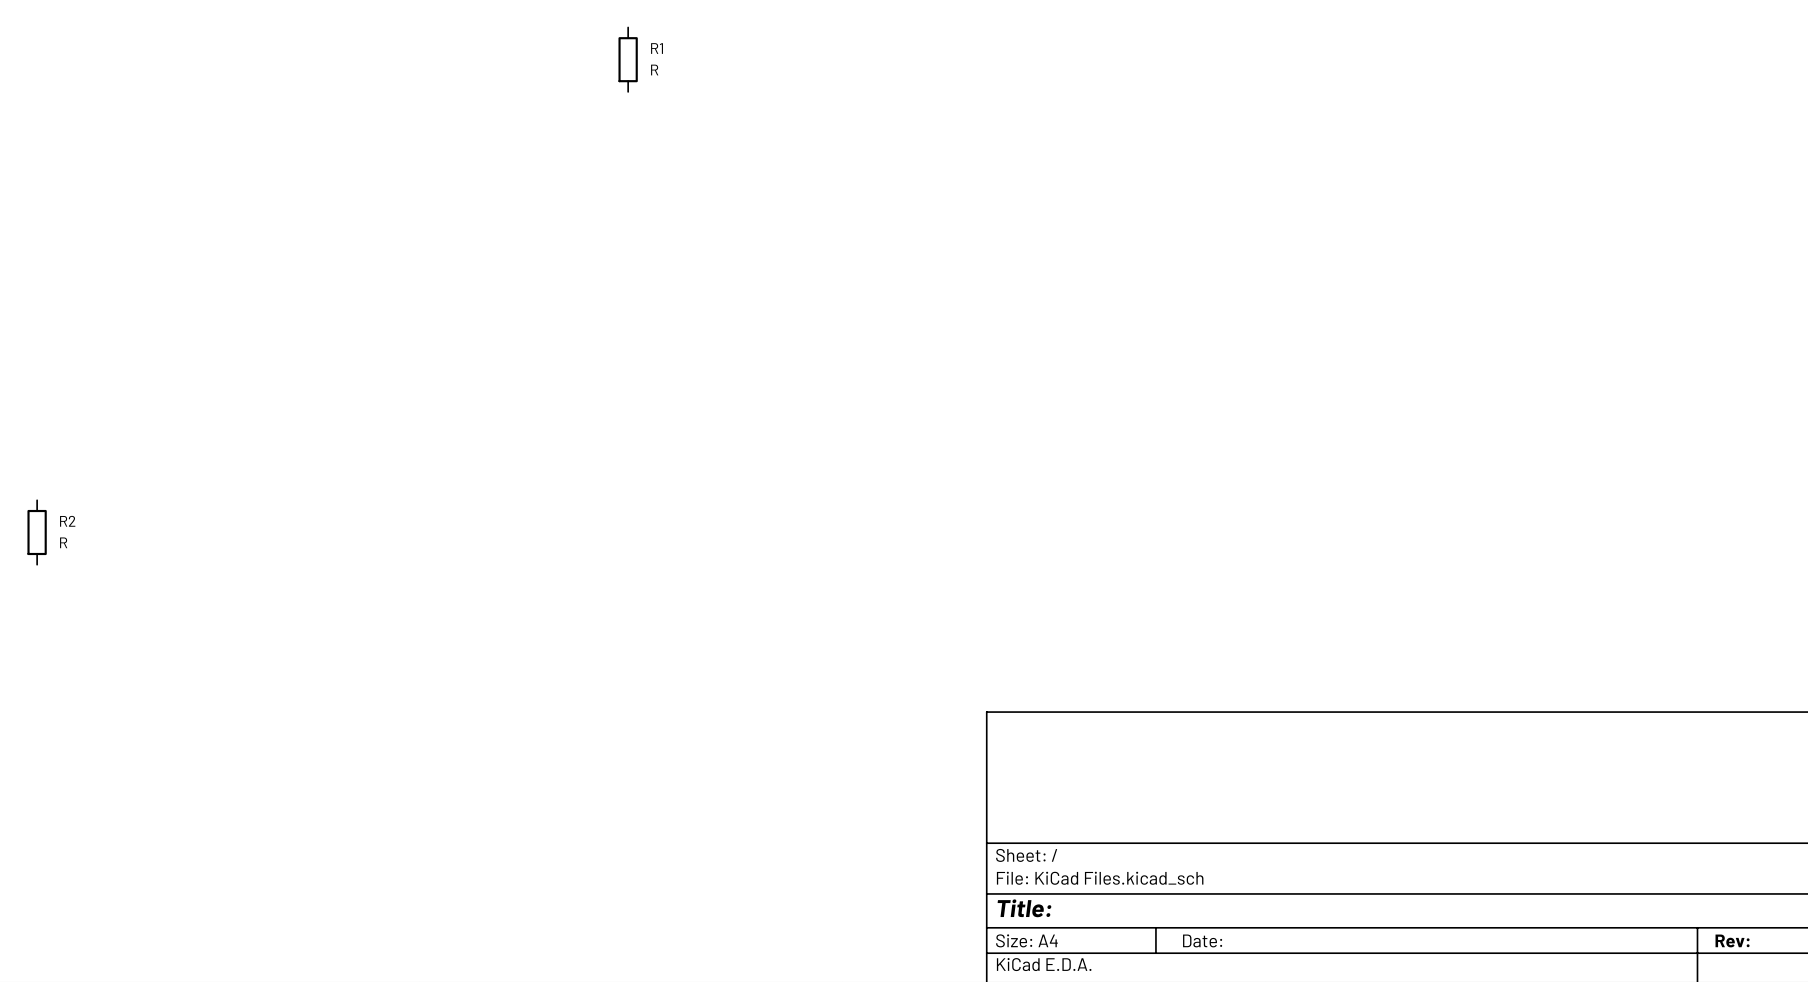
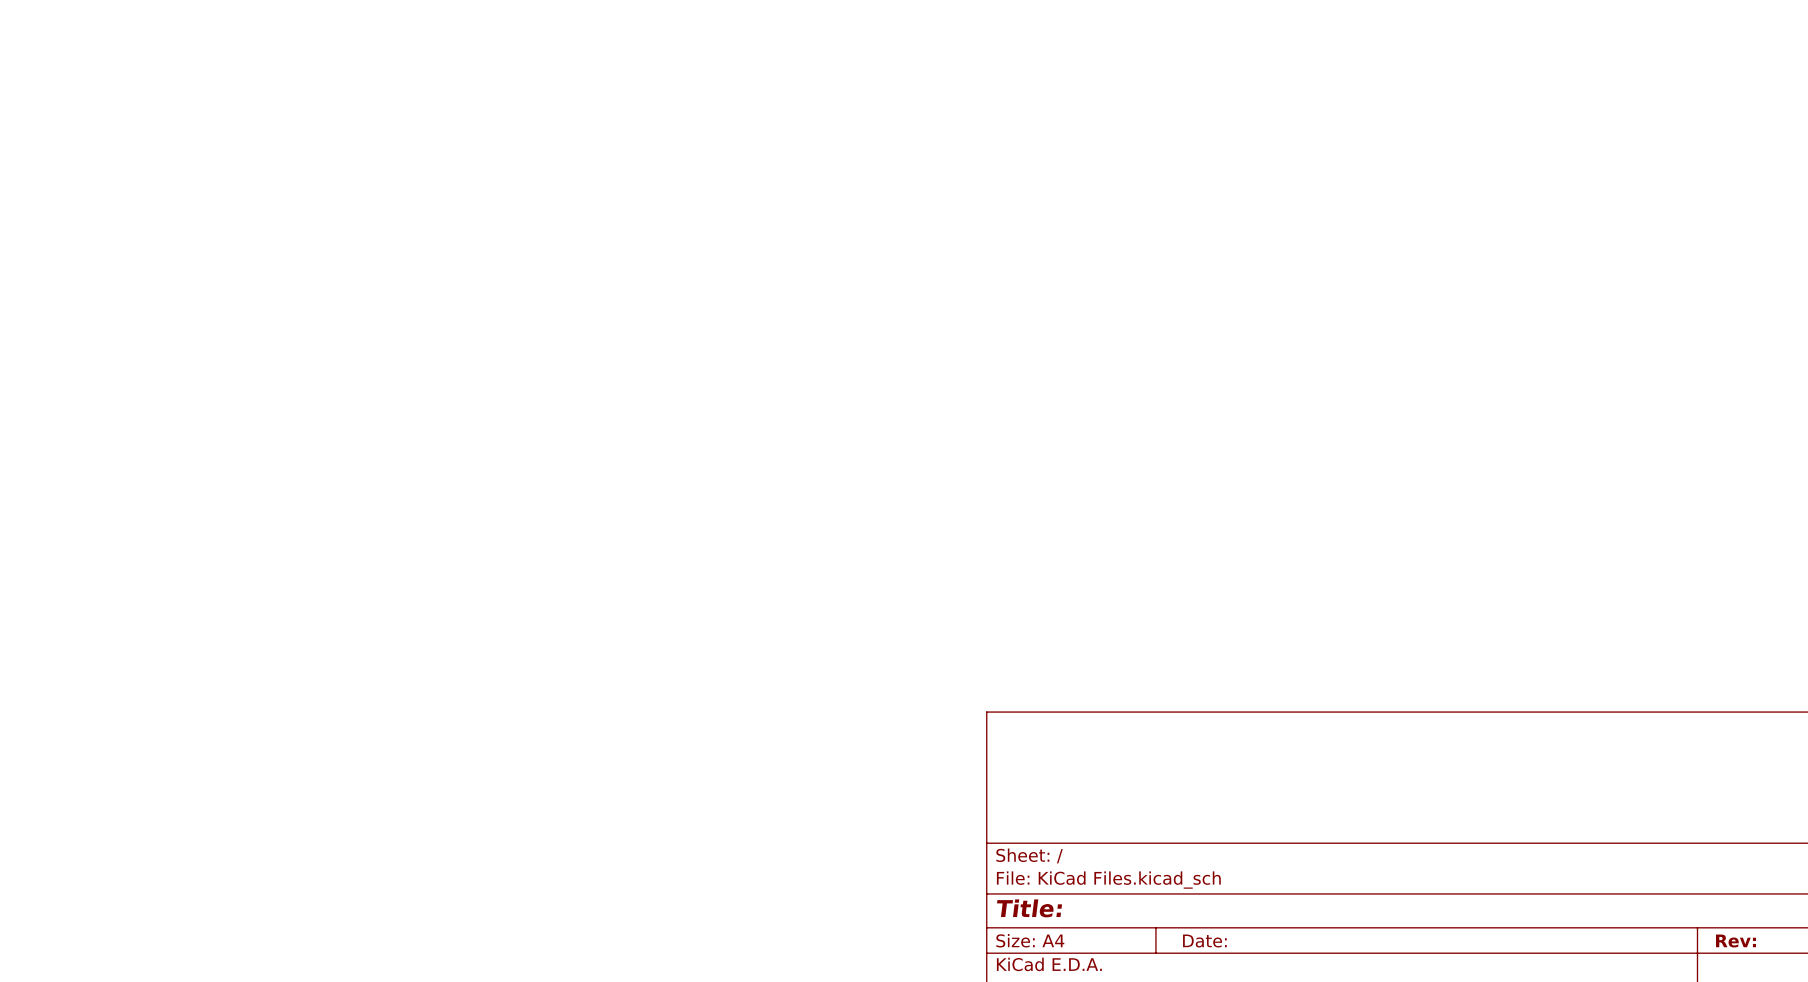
R1: R (628, 59) -> none
R2: R (37, 532) -> none

